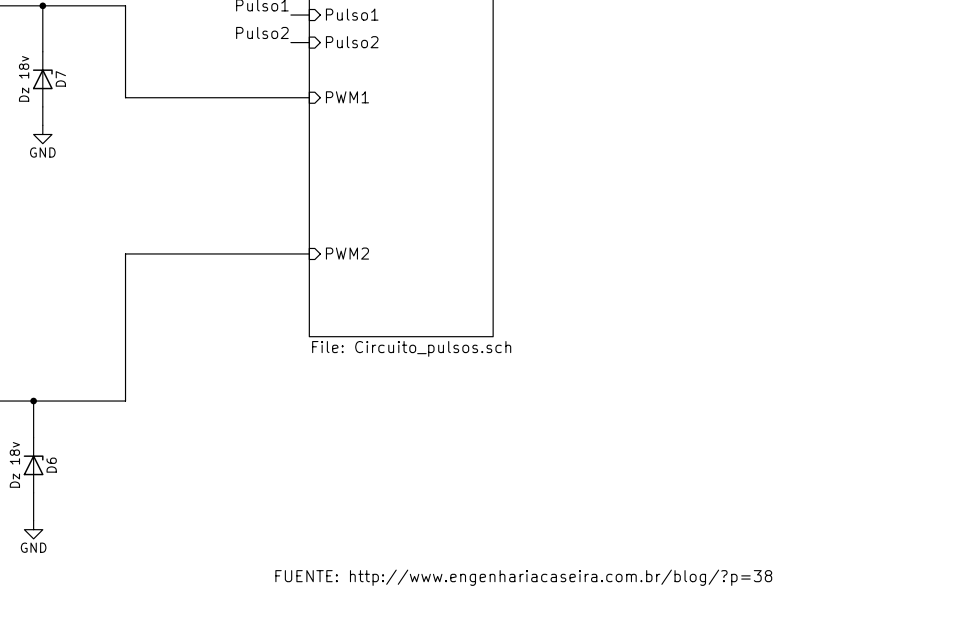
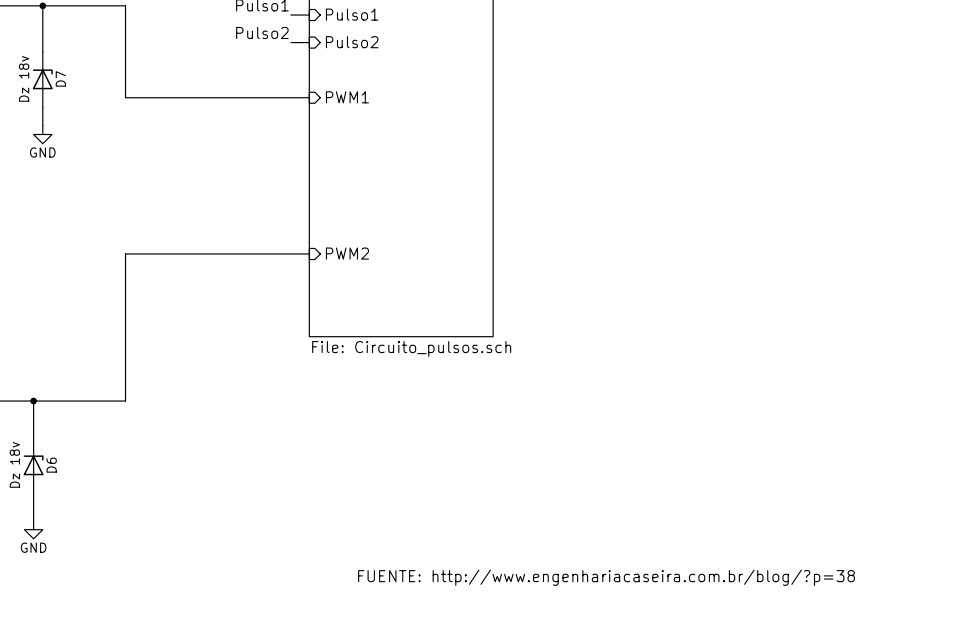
text position: FUENTE: http://www.engenhariacaseira.com.br/blog/?p=38 (523, 577) -> FUENTE: http://www.engenhariacaseira.com.br/blog/?p=38 (606, 577)

